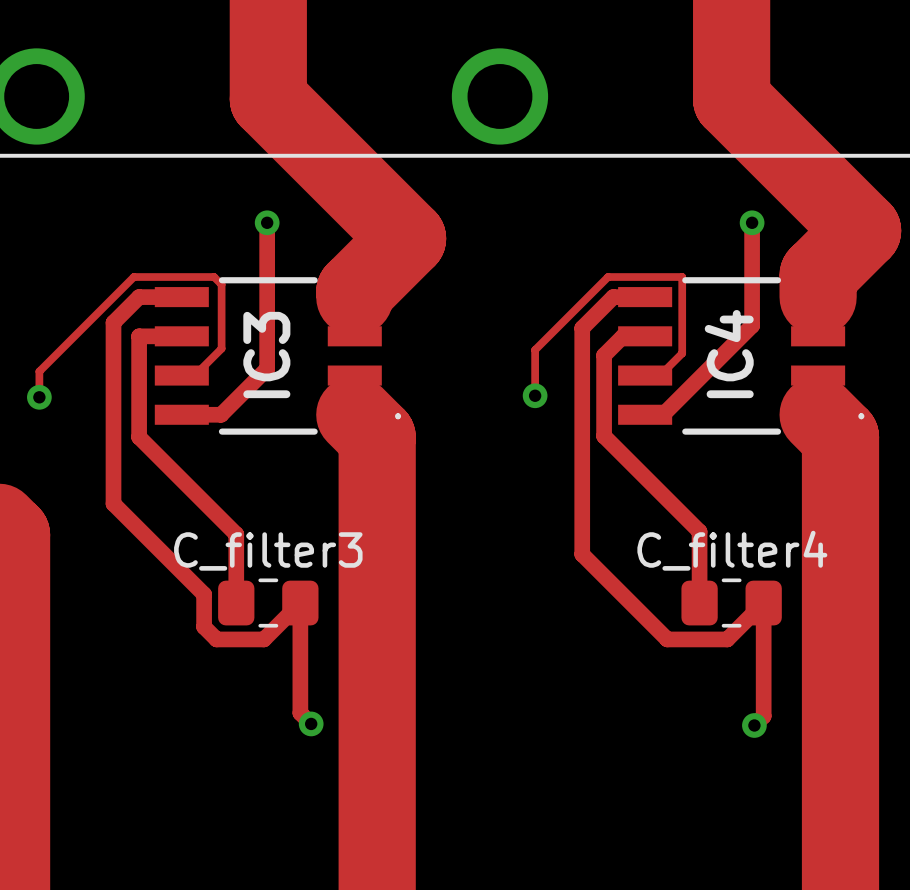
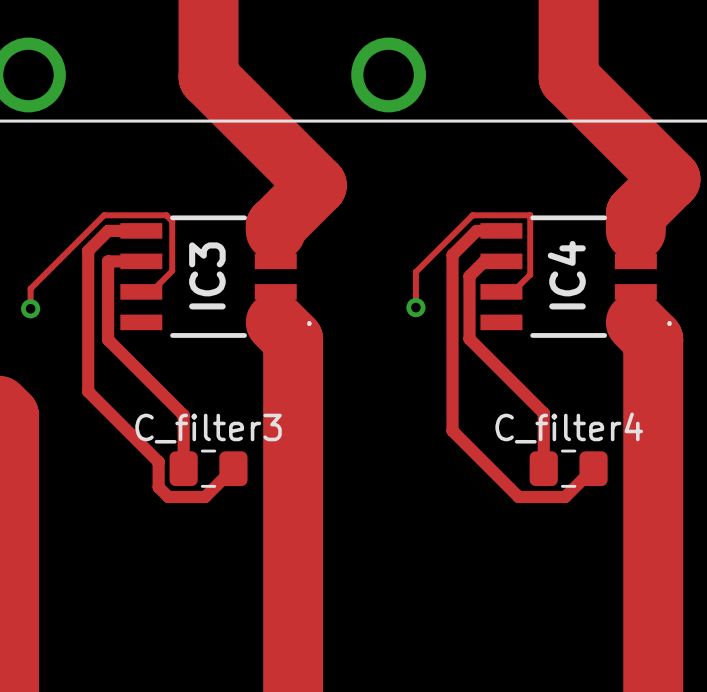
track: (267, 222) (267, 368) (221, 414) (181, 414) -> none
via: (267, 222) -> none
track: (752, 222) (752, 325) (663, 414) (645, 414) -> none
via: (752, 222) -> none
track: (300, 603) (300, 713) (311, 723) -> none
track: (763, 603) (763, 716) (754, 725) -> none
via: (311, 723) -> none
via: (754, 725) -> none

